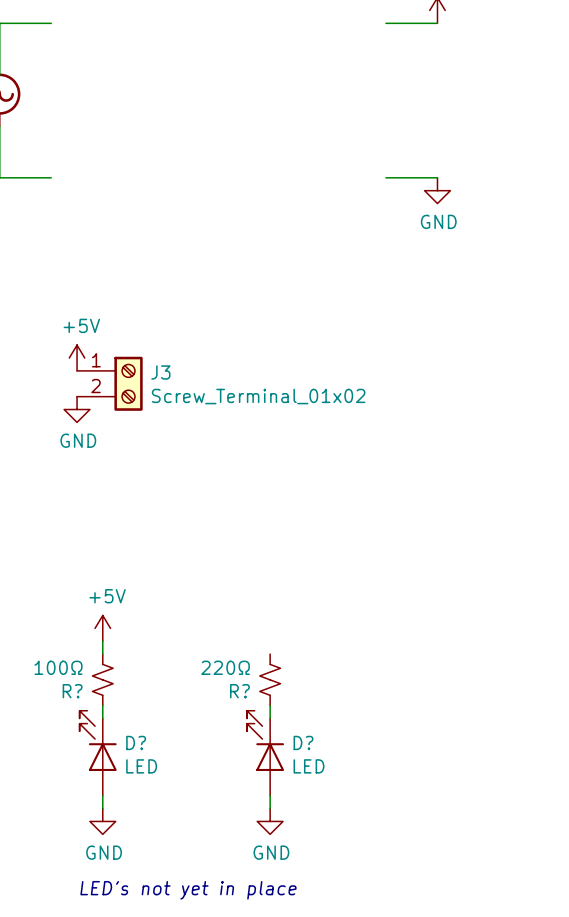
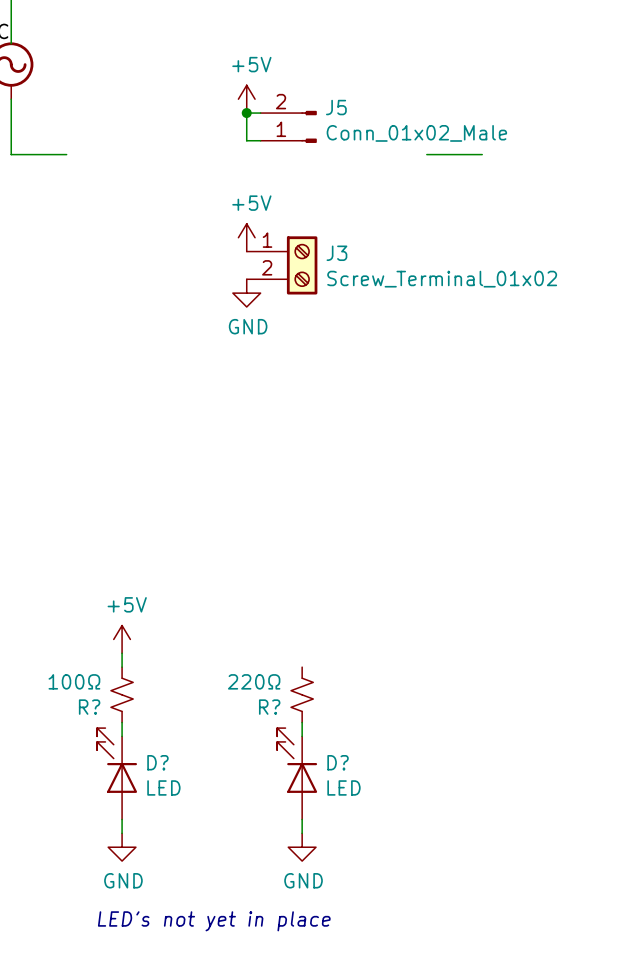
power symbol: none -> +5V (246, 99)
junction: none -> (246, 113)
wire: none -> (260, 113) (246, 113) (246, 140) (260, 140)
J5: none -> Conn_01x02_Male (288, 126)
power symbol: GND (437, 190) -> none
power symbol: none -> +5V (246, 237)
power symbol: none -> GND (246, 293)
power symbol: +5V (77, 358) -> none
J3 position: (109, 383) -> (282, 265)
power symbol: GND (77, 409) -> none

